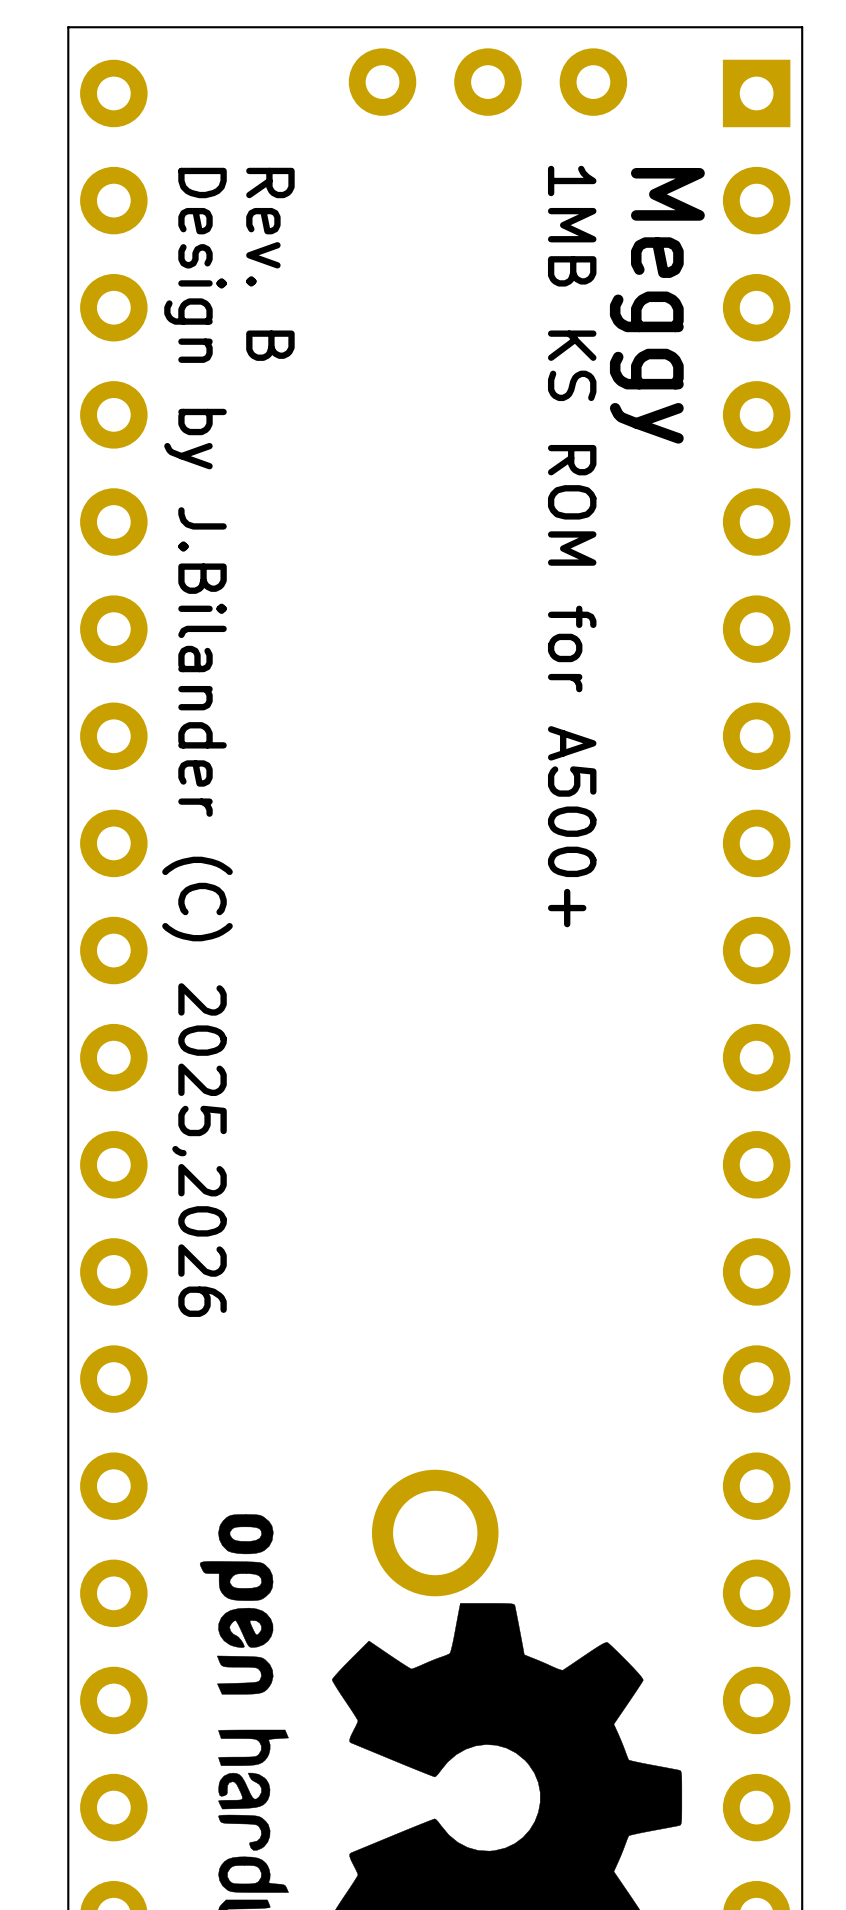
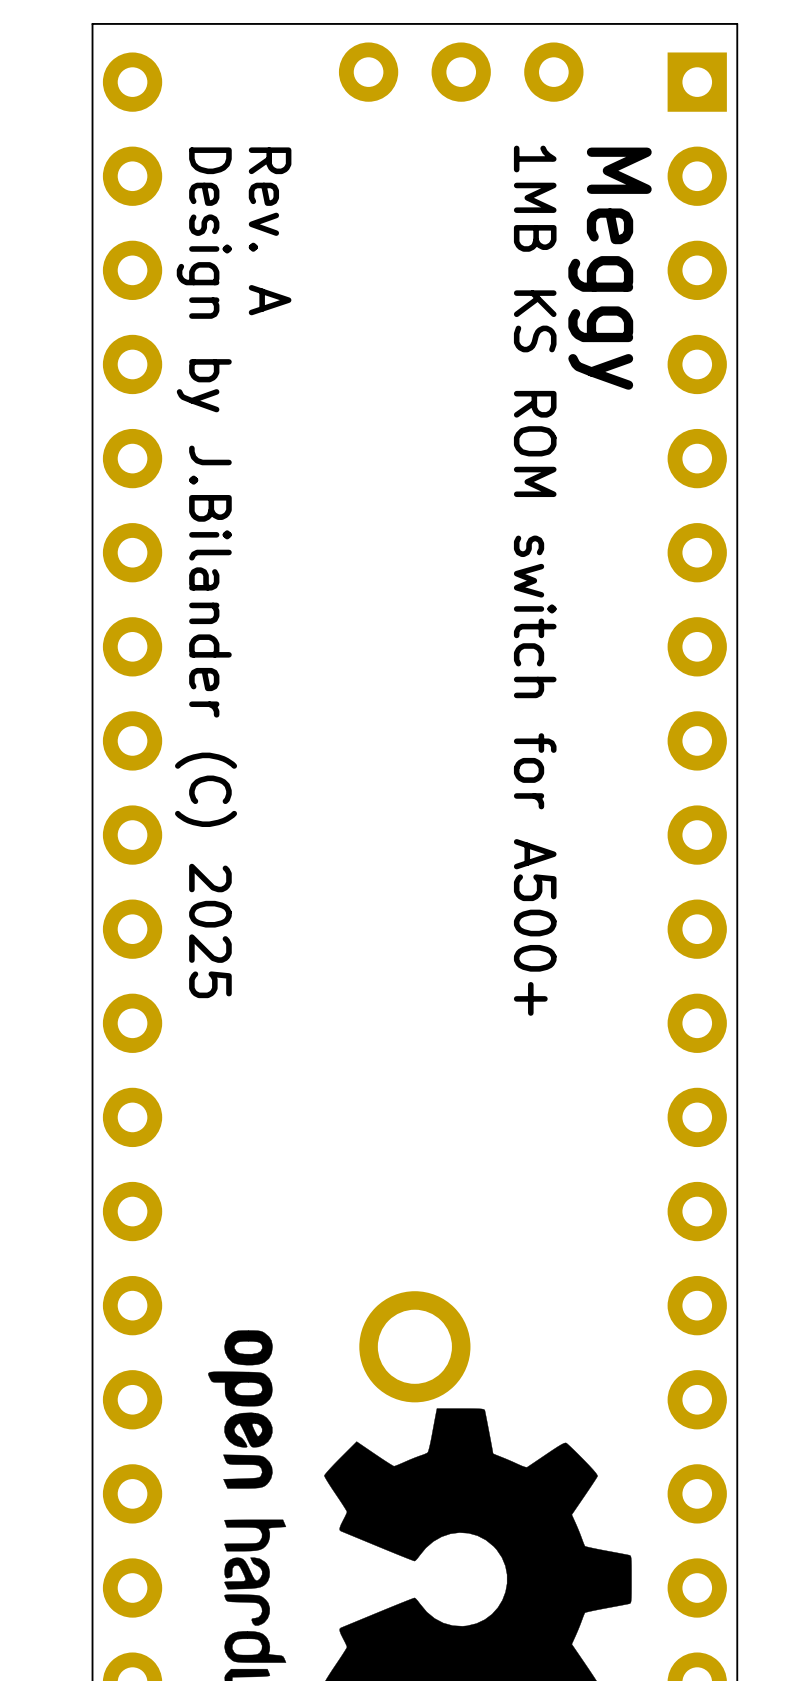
text: Rev. B (270, 264) -> Rev. A (270, 231)
text: 1MB KS ROM for A500+ (572, 546) -> 1MB KS ROM switch for A500+ (535, 580)
text: Design by J.Bilander (C) 2025,2026 (197, 742) -> Design by J.Bilander (C) 2025 (206, 572)

